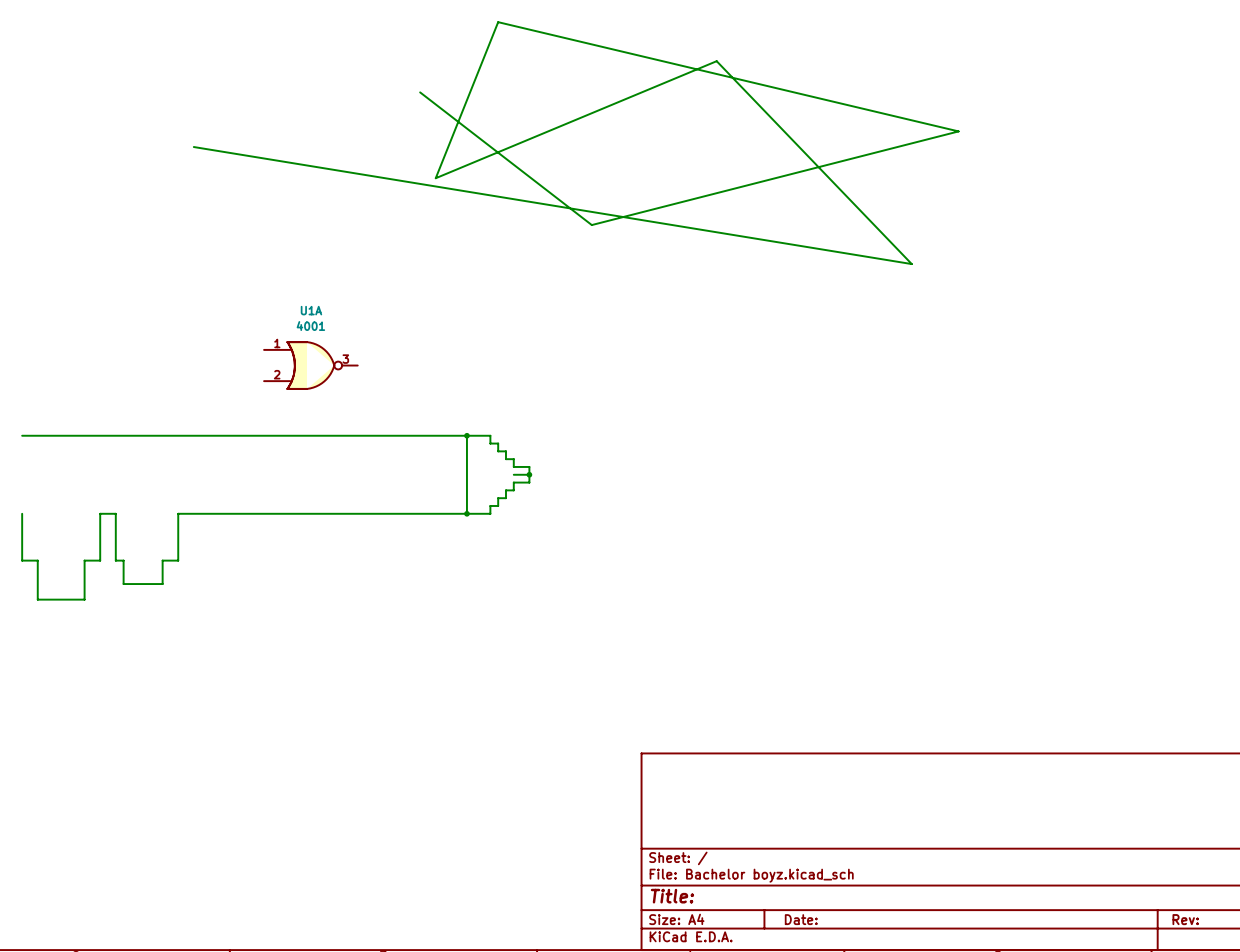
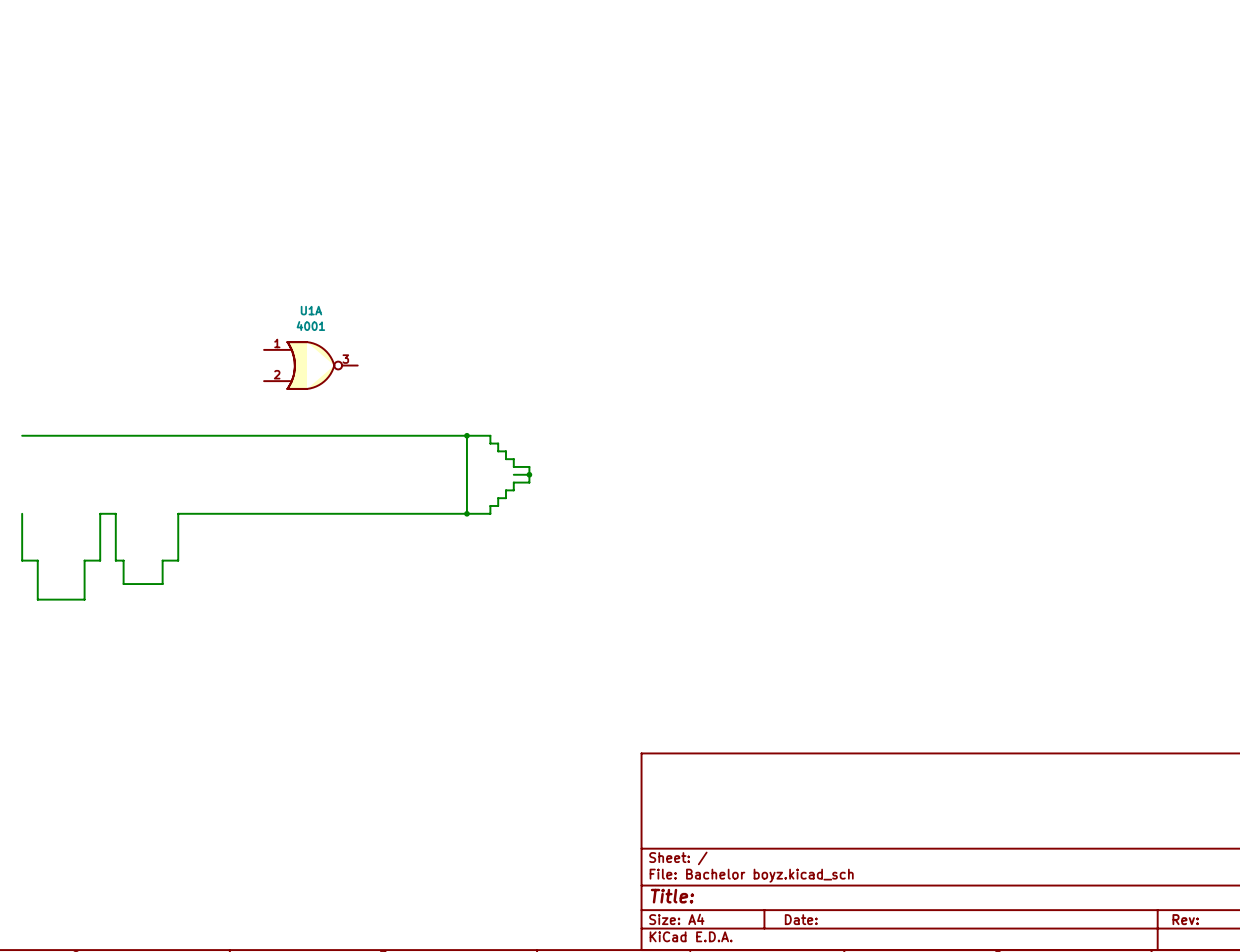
wire: (420, 92) (591, 225) (958, 131) (498, 22) (435, 178) (716, 61) (911, 264) (193, 147) -> none

